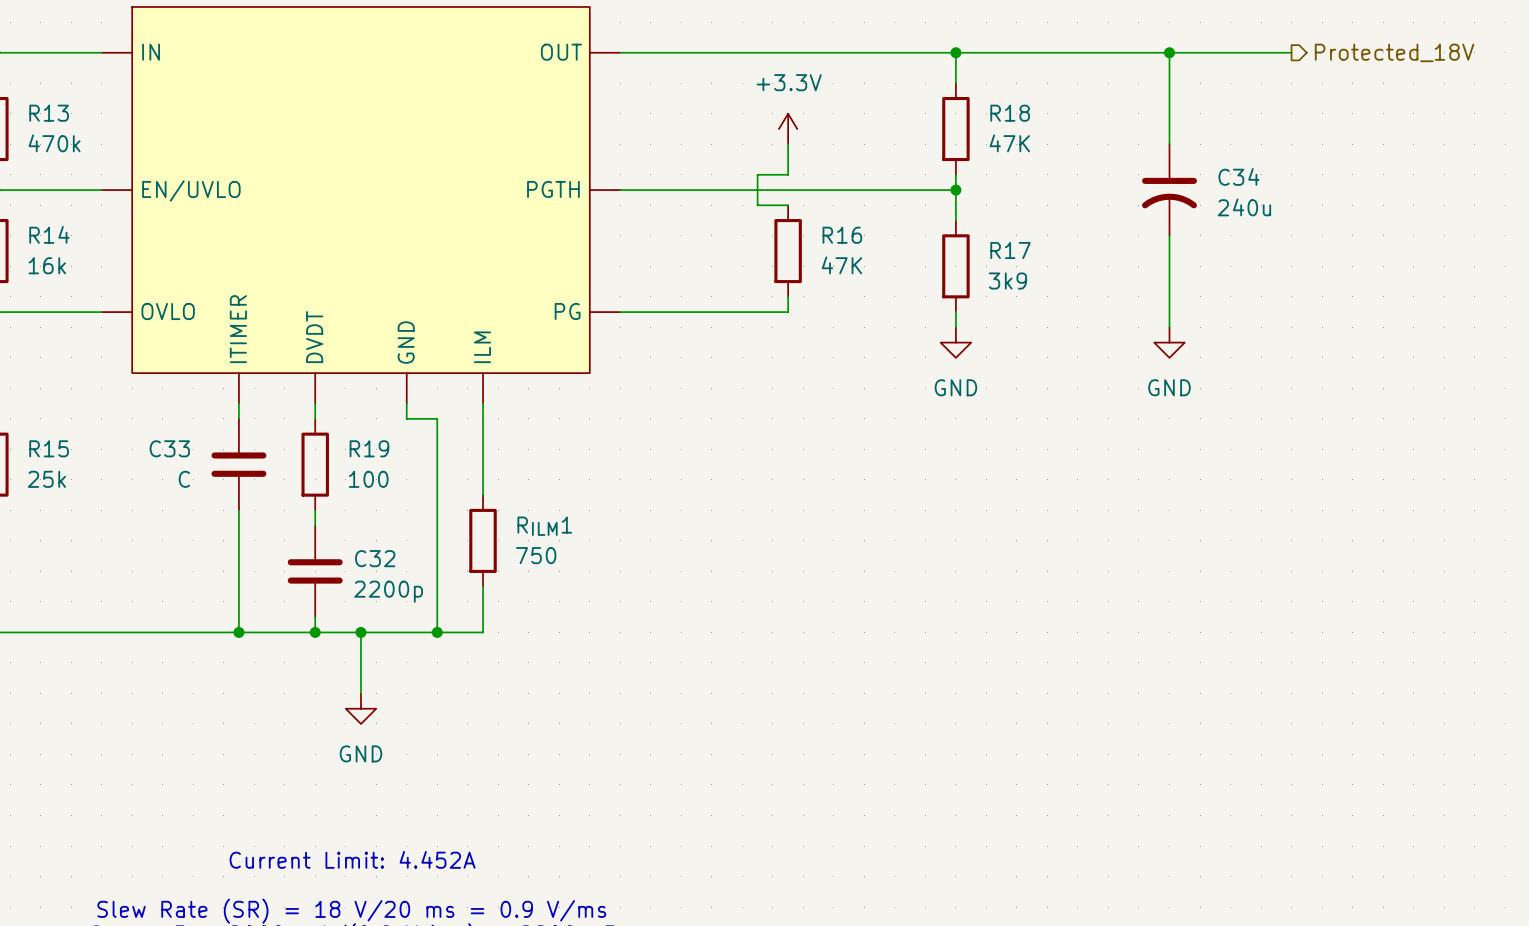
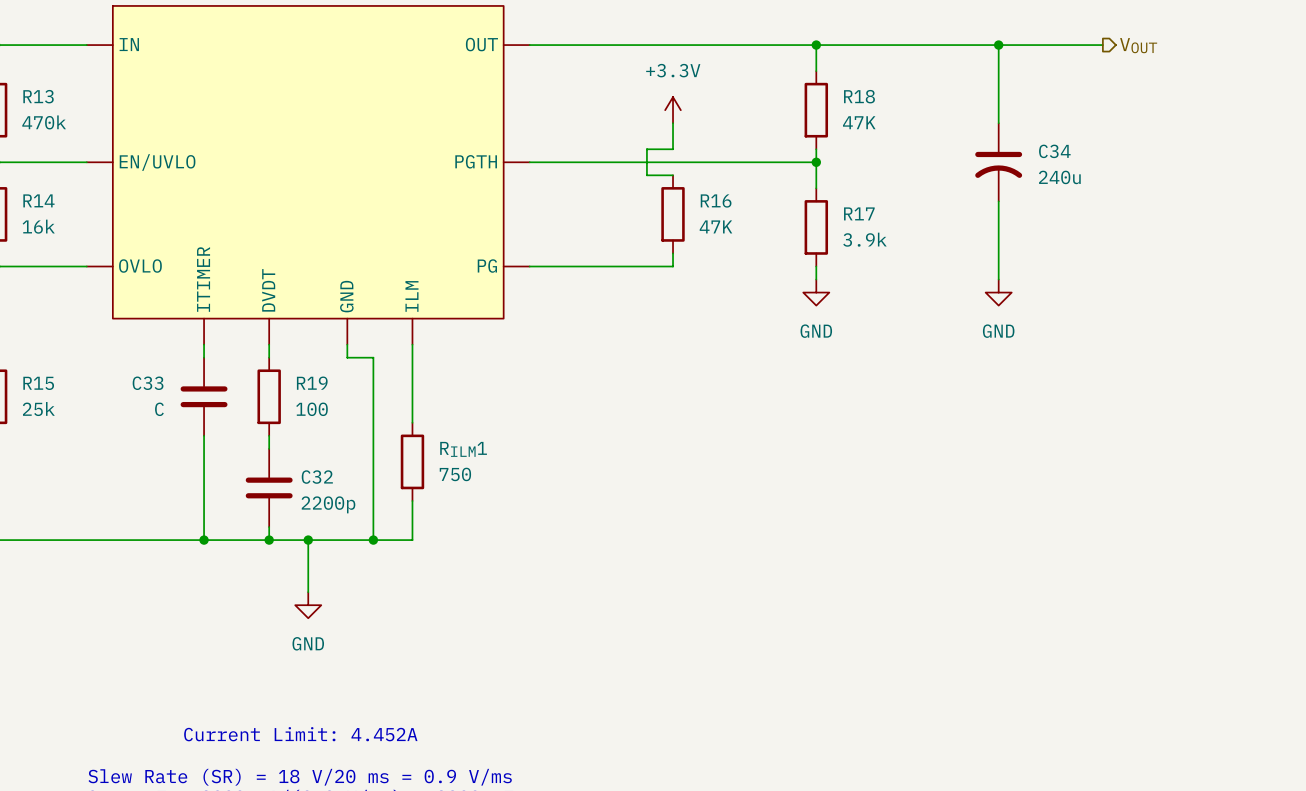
hierarchical label: Protected_18V (1394, 52) -> VOUT (1138, 45)
R17 value: 3k9 (1007, 281) -> 3.9k (864, 239)

